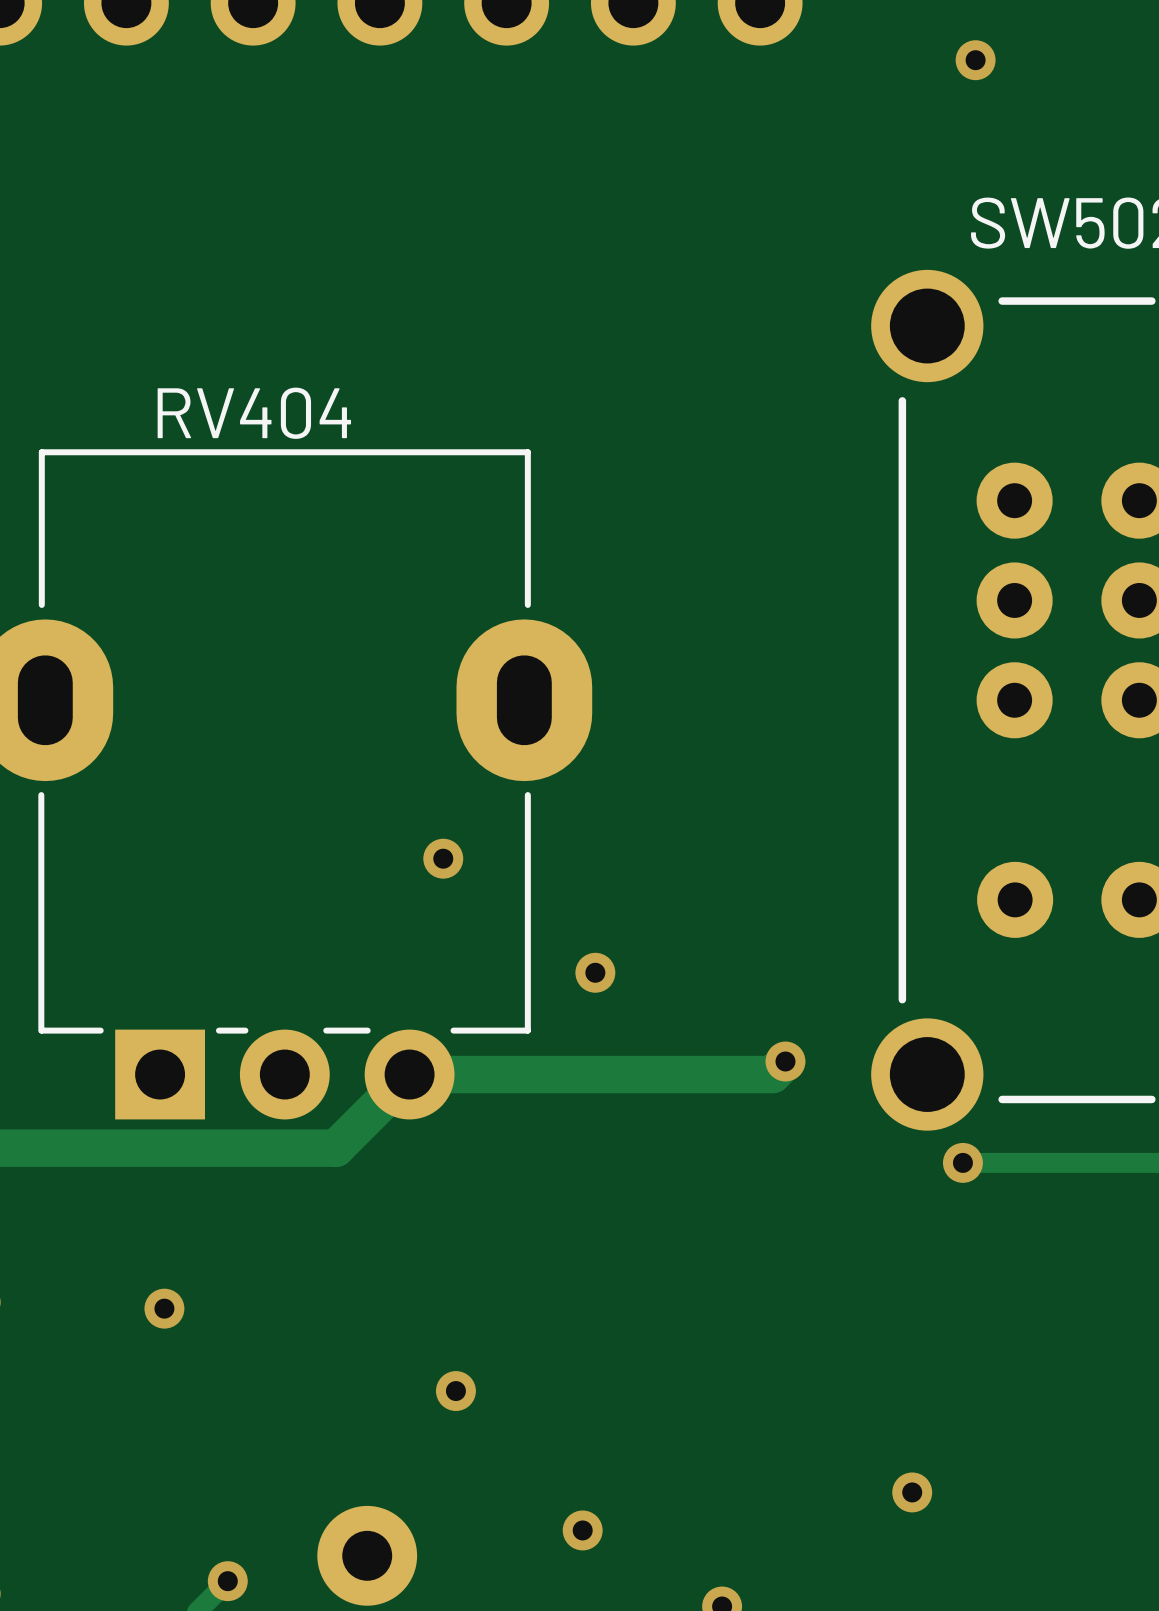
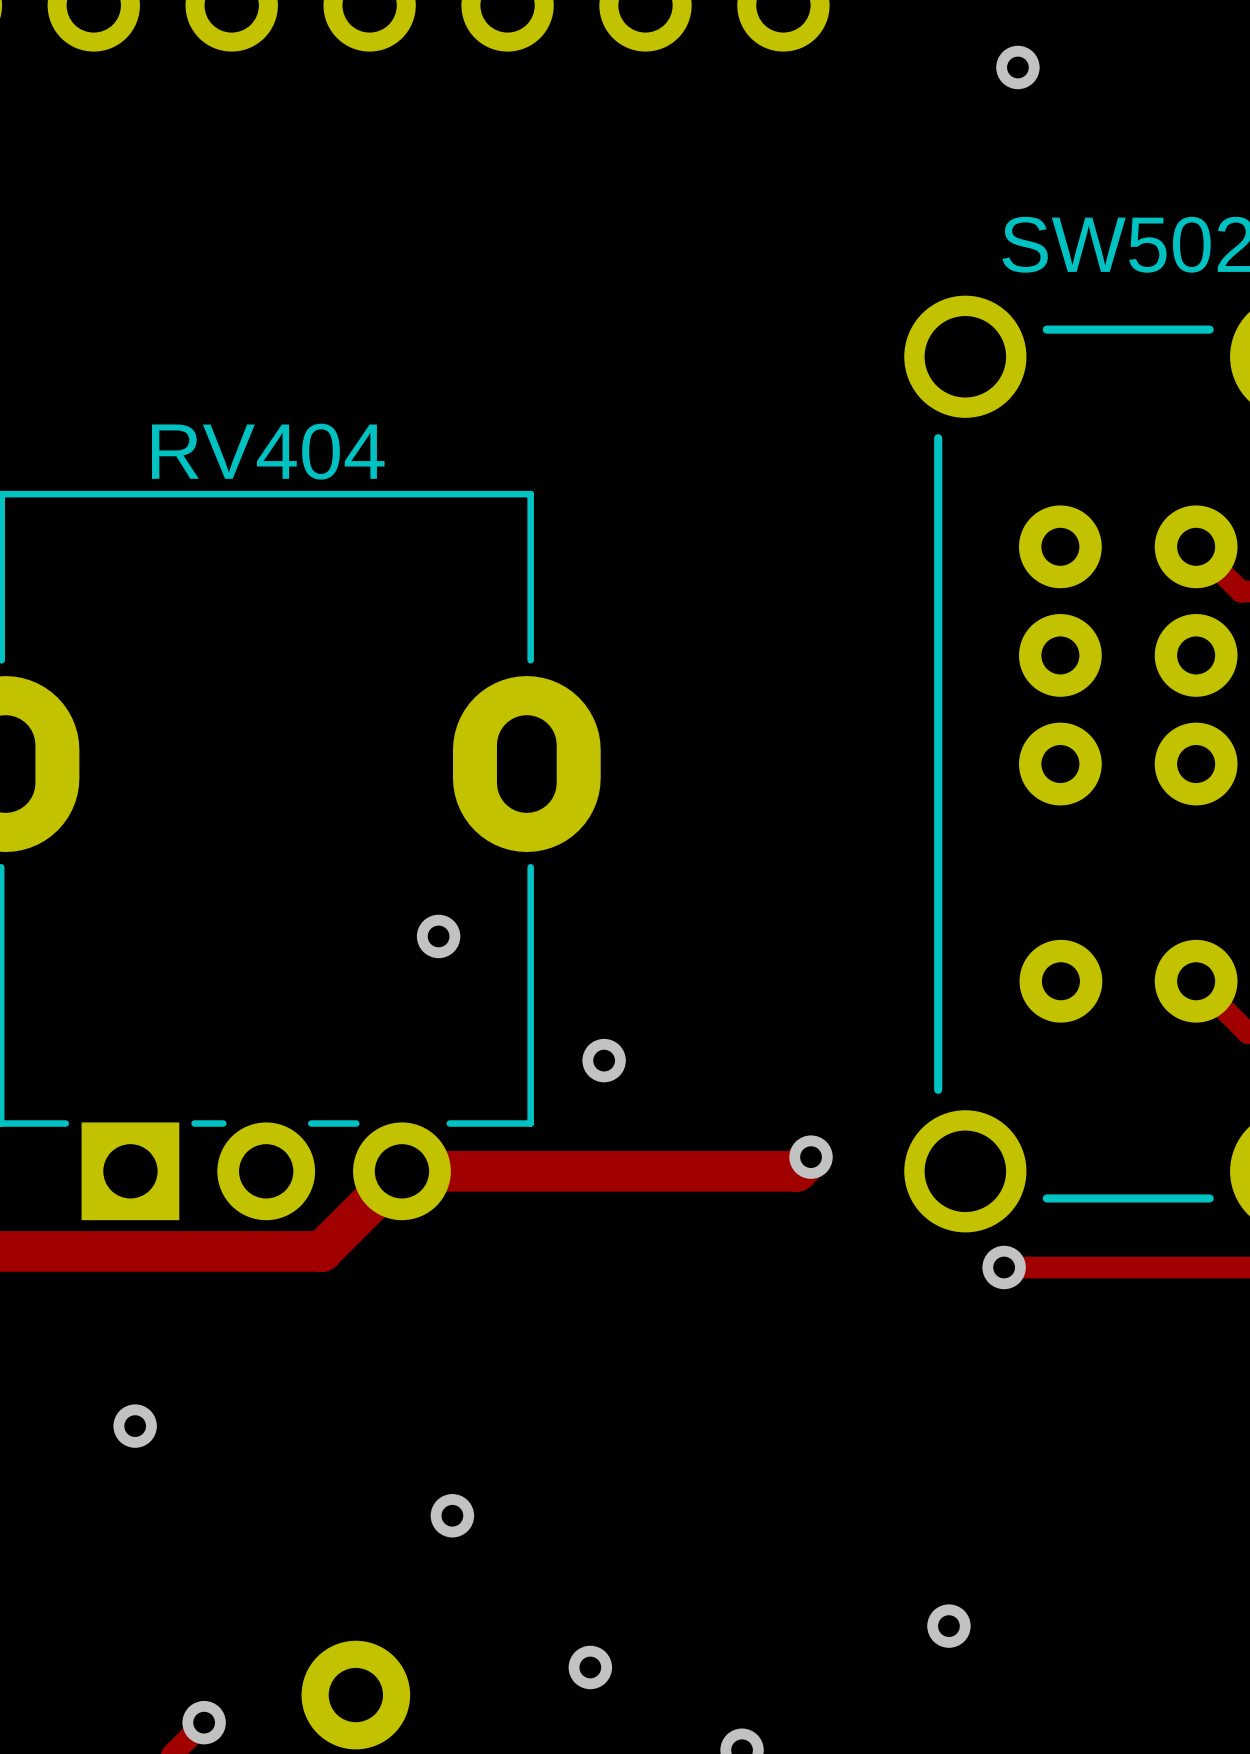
RV404 name position: RV404 (254, 413) -> RV404 (268, 451)

